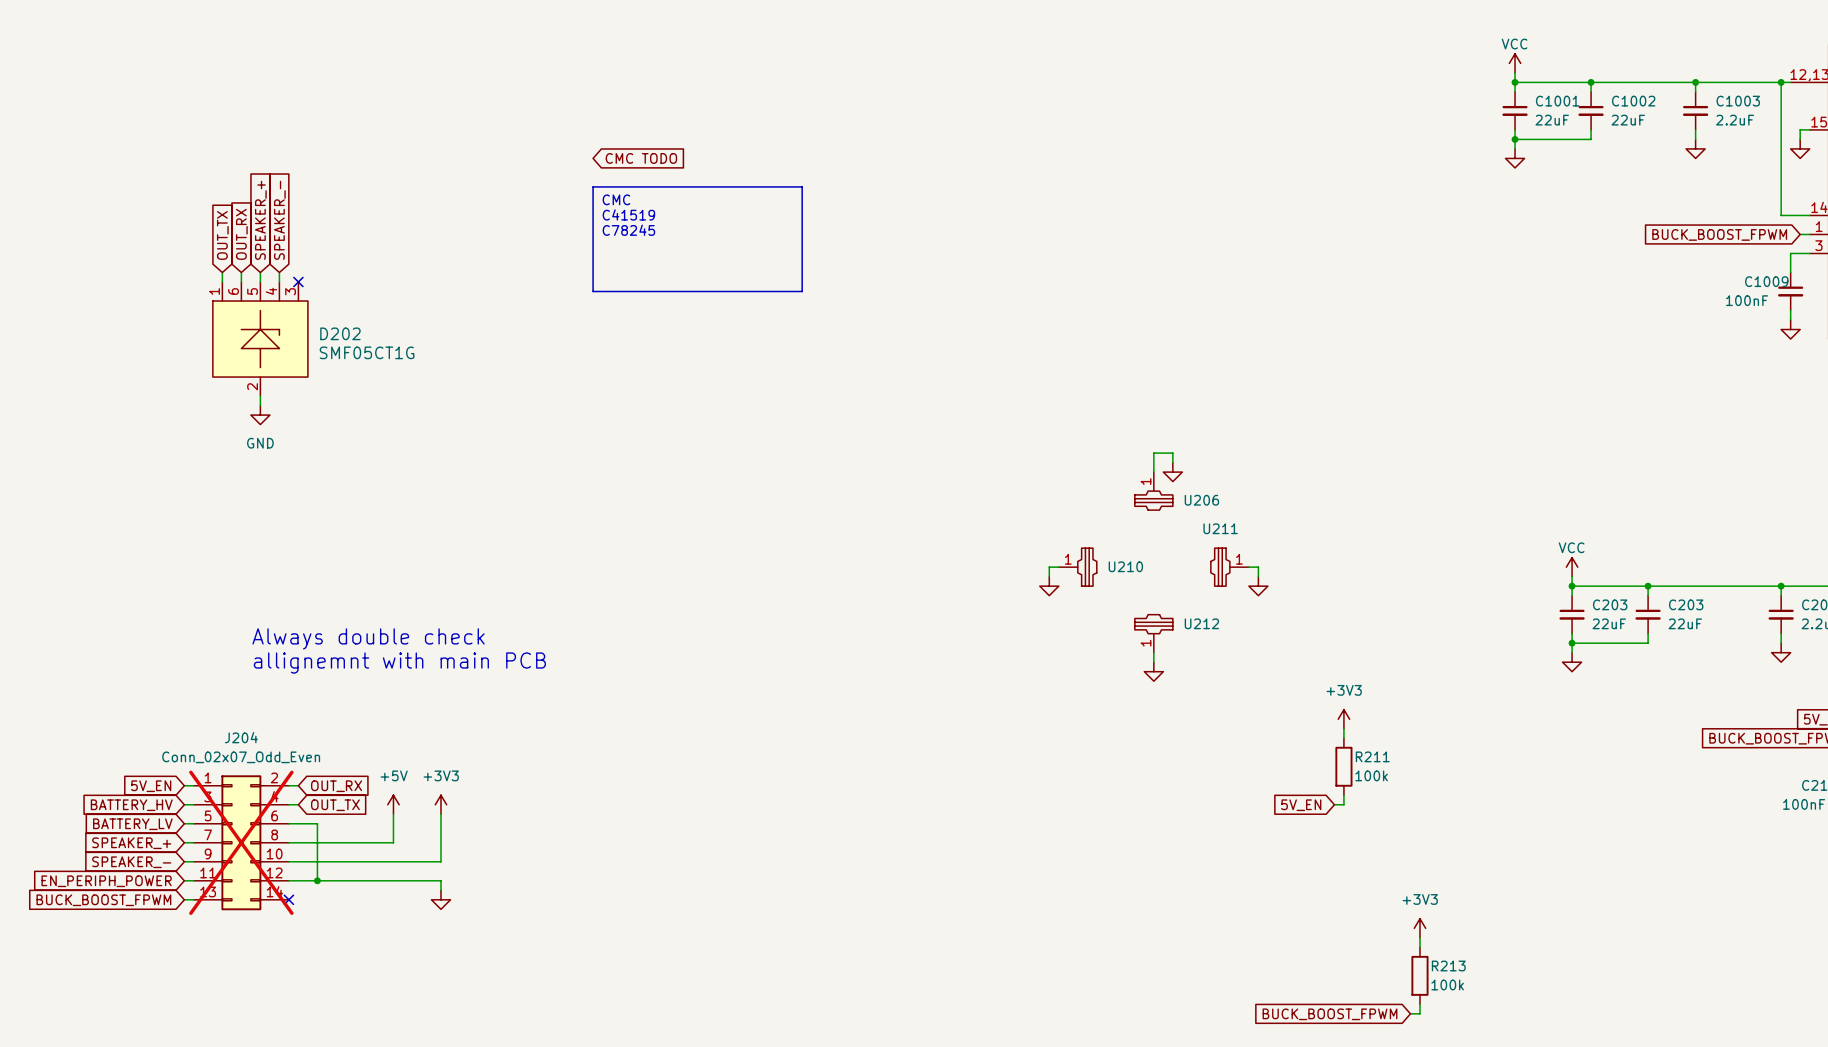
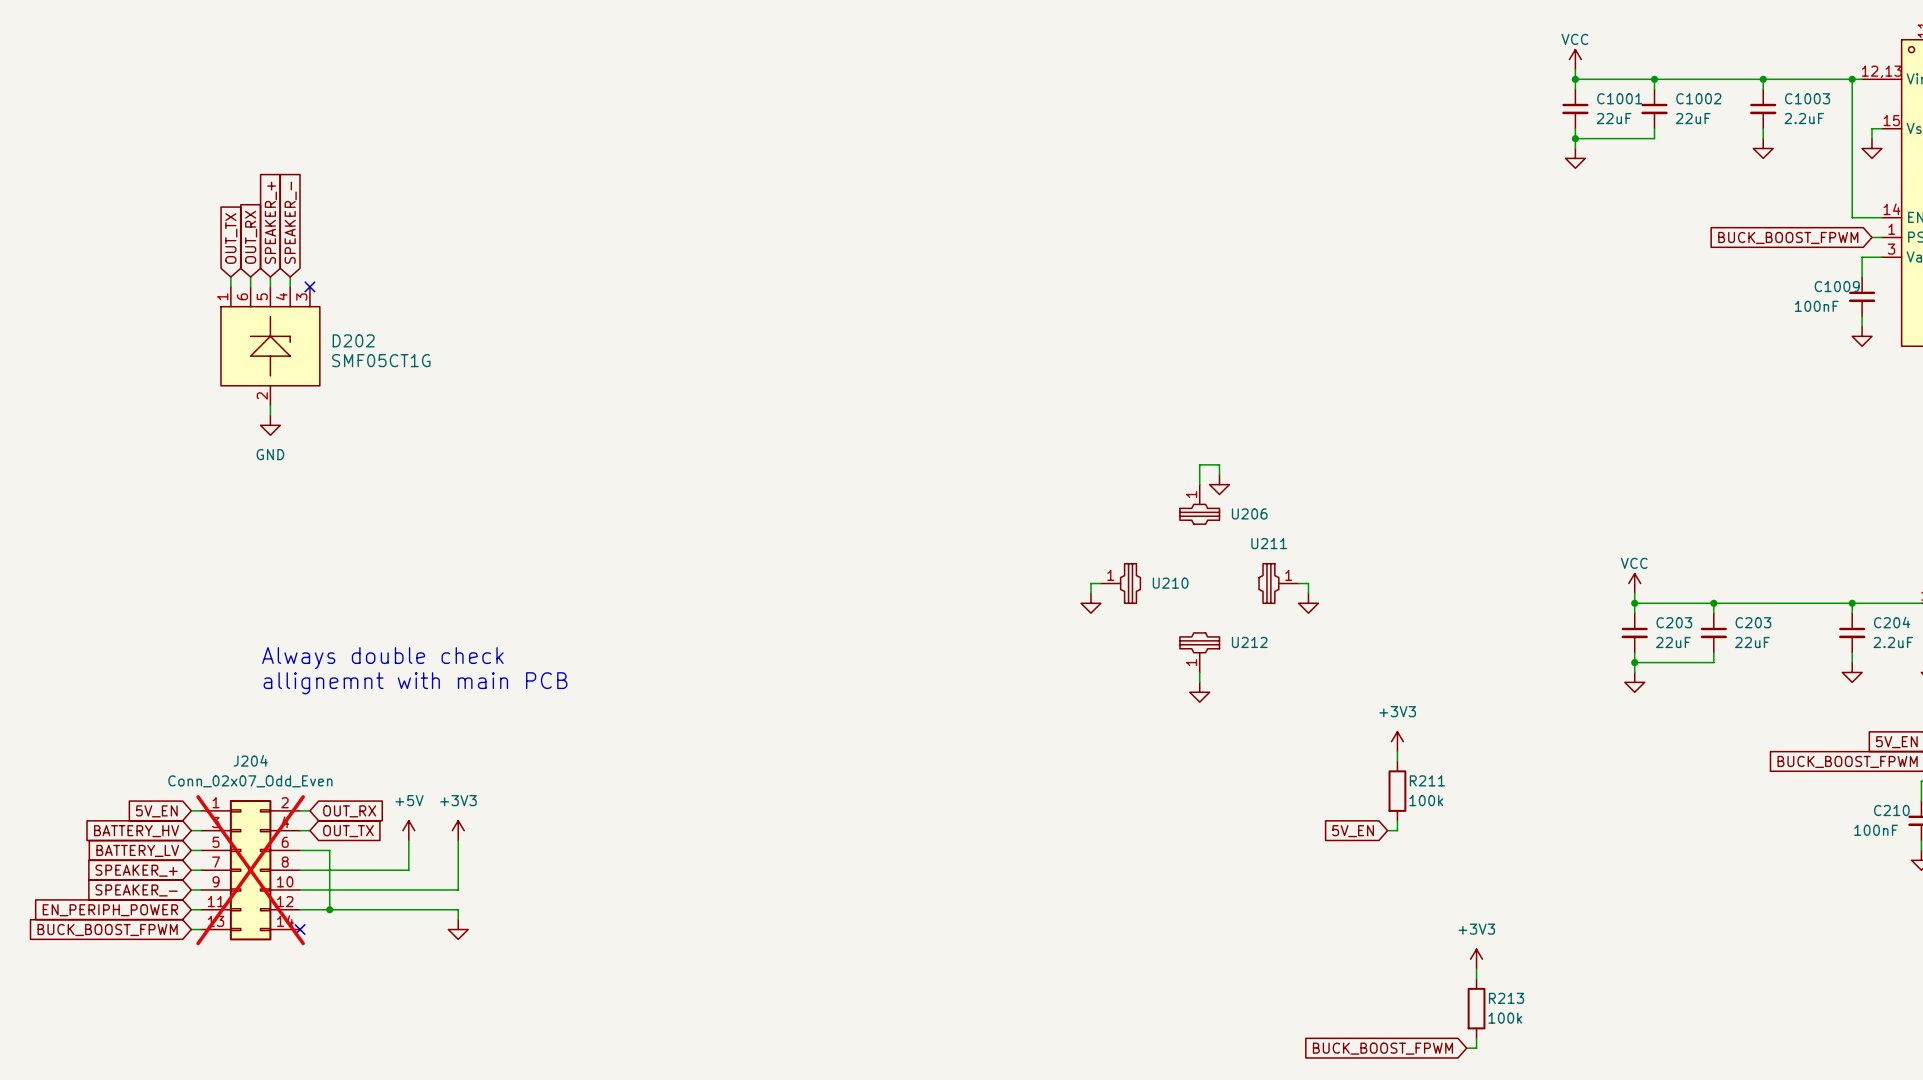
global label: CMC TODO (641, 158) -> none
line: (593, 186) (802, 186) (802, 291) (593, 291) (593, 186) -> none
text: CMC (616, 199) -> none
text: C41519 (628, 214) -> none
text: C78245 (628, 230) -> none

